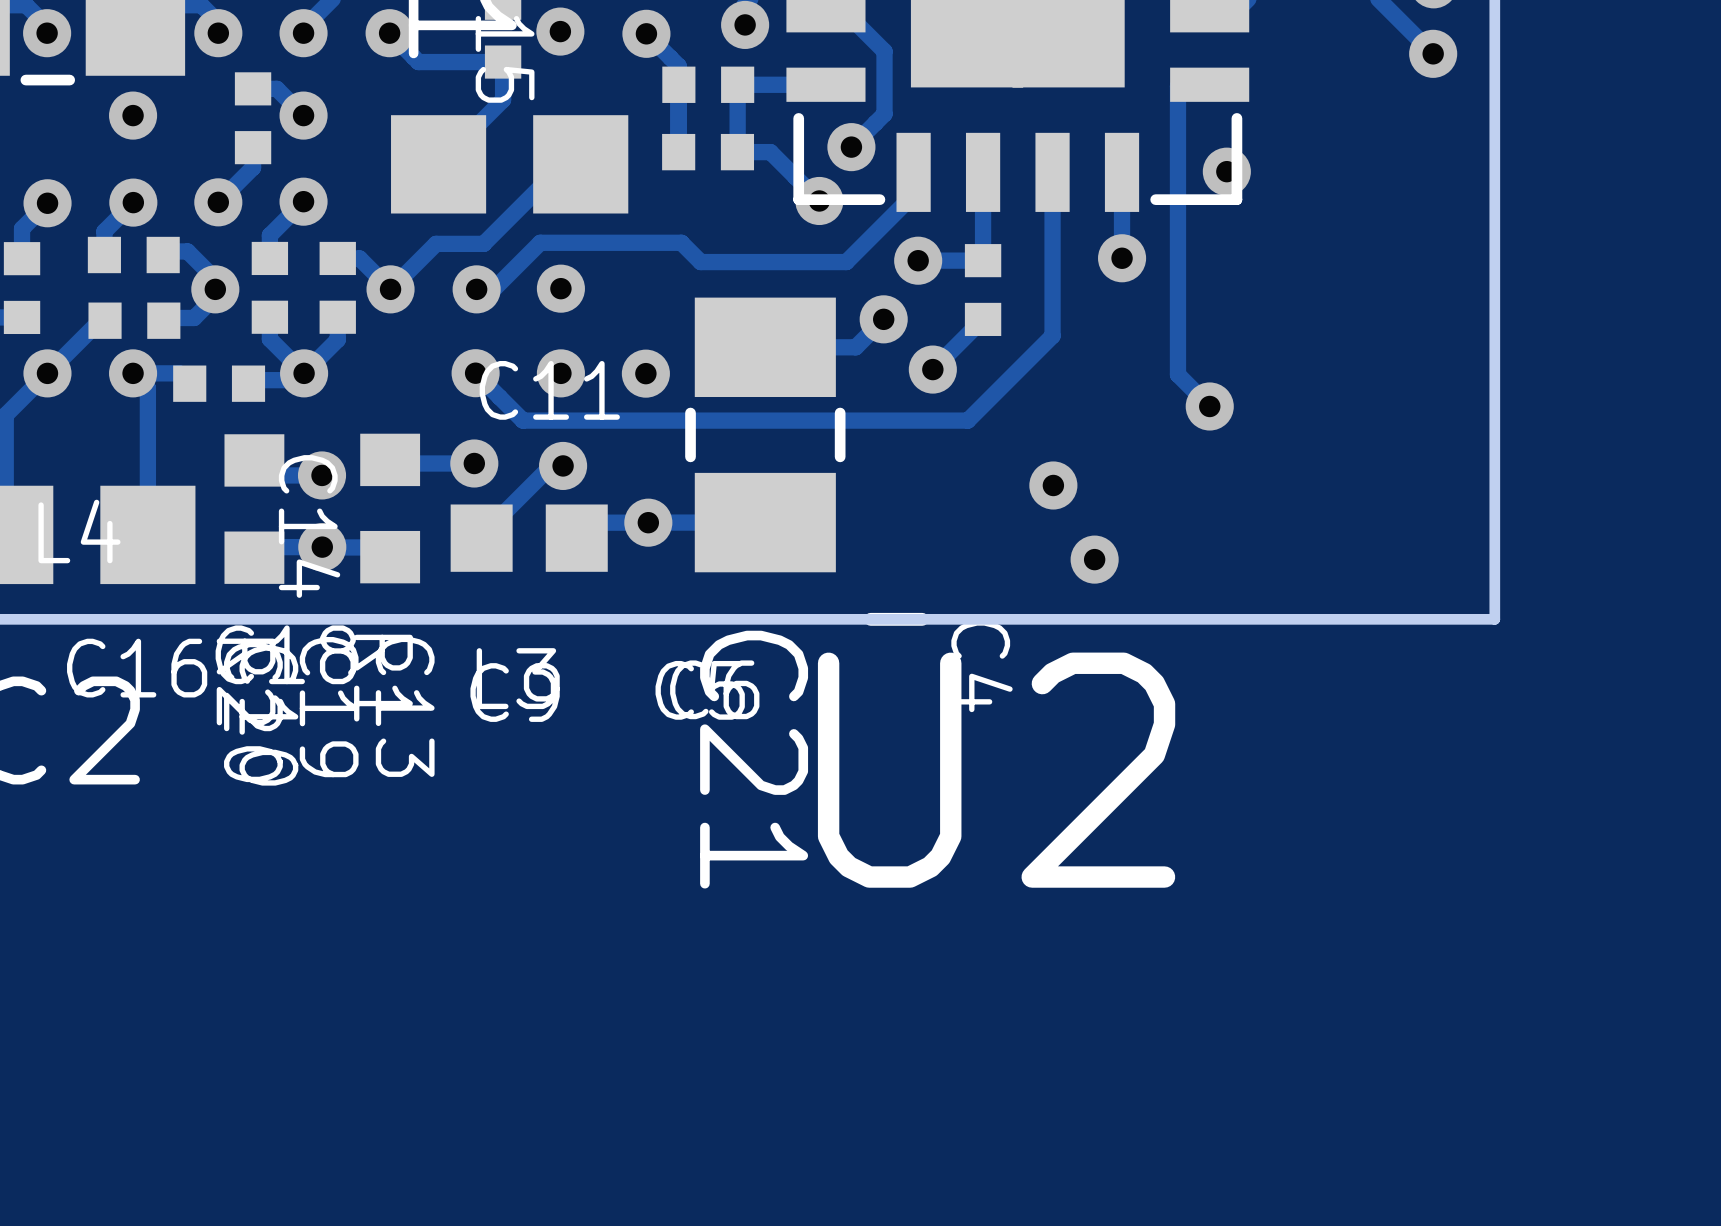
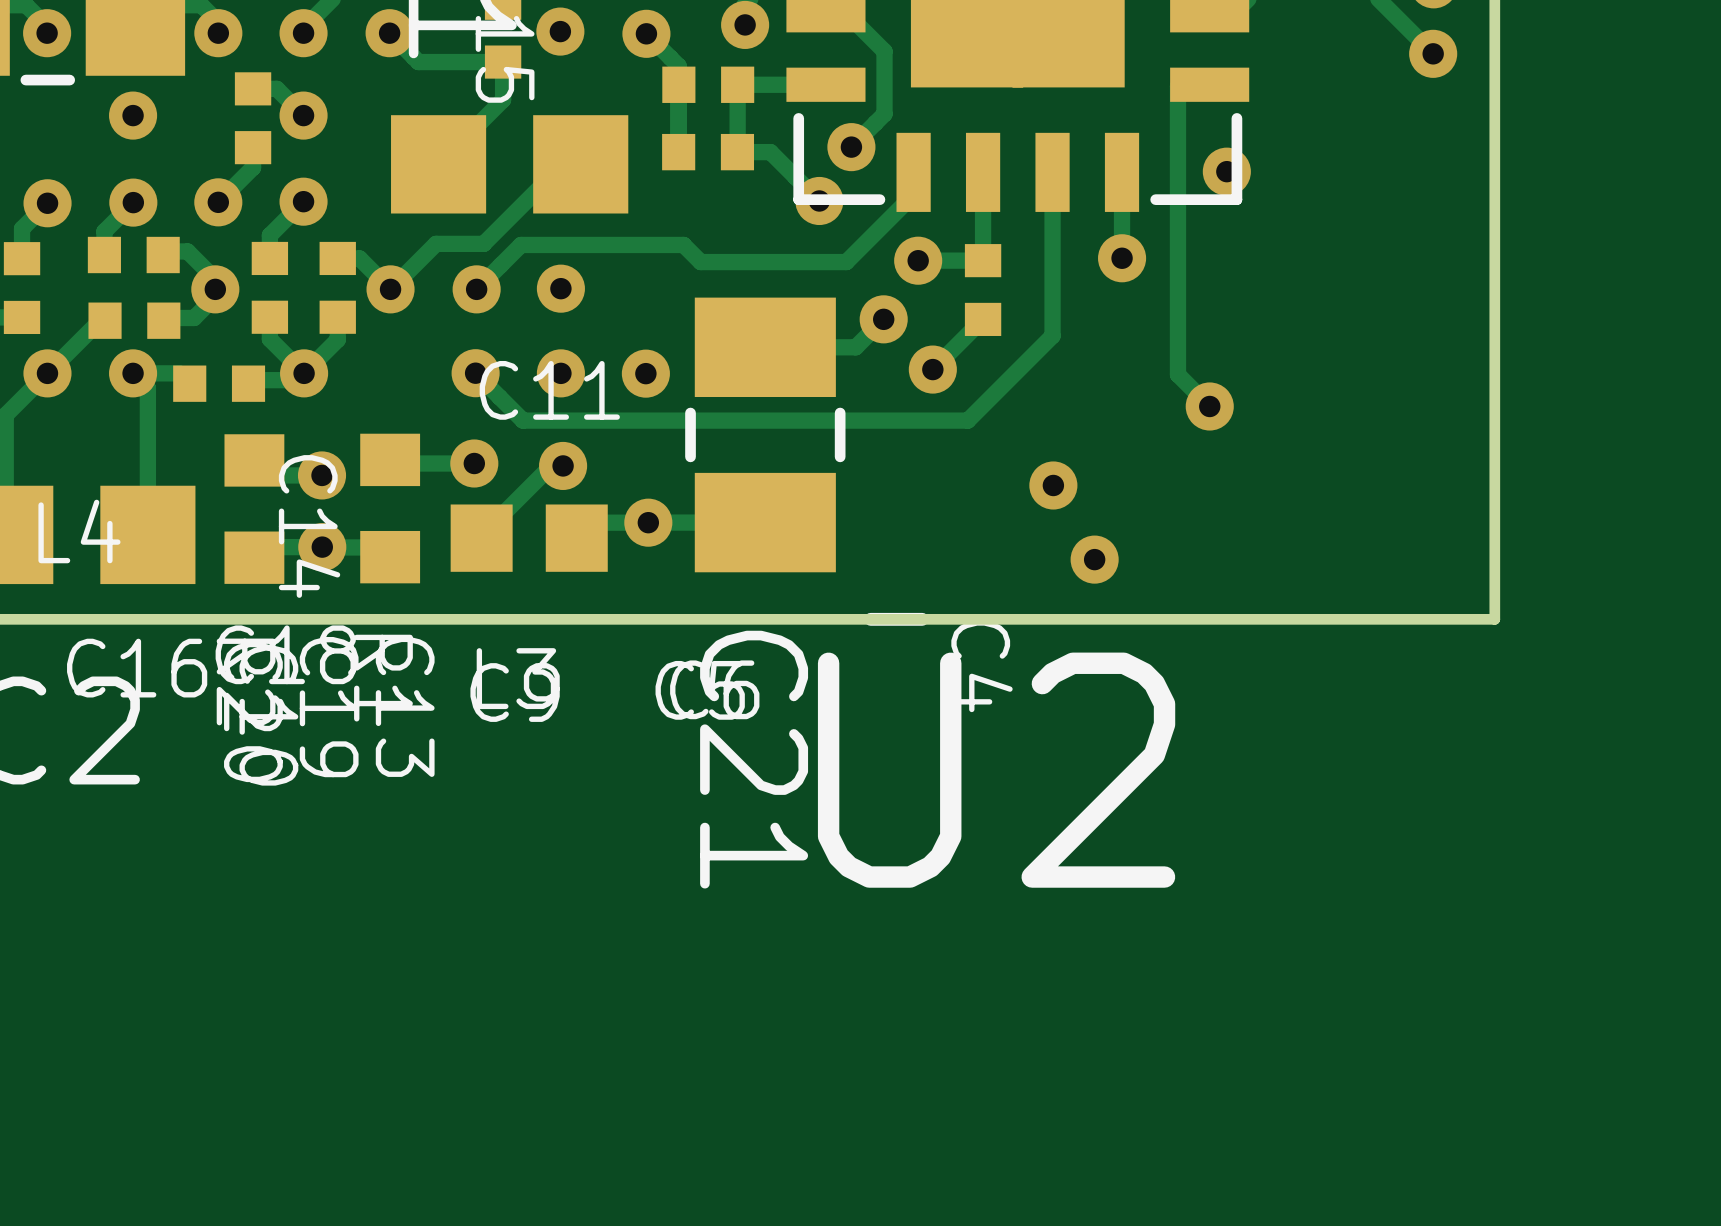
track: (683, 244) (681, 242) (540, 242) (493, 289) (476, 289) -> (683, 244) (521, 244) (476, 289)

